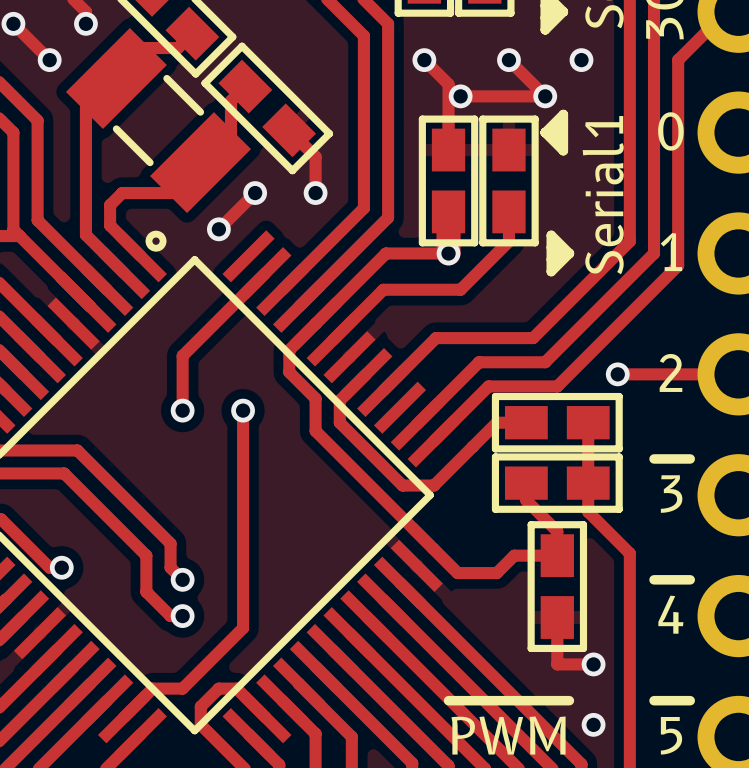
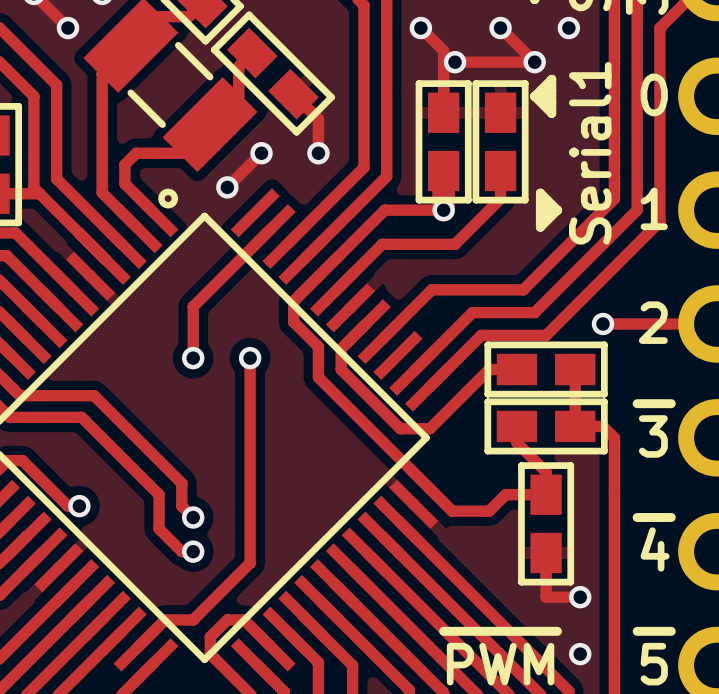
track: (588, 483) (588, 511) (629, 553) -> (575, 426) (603, 426) (614, 437) (614, 492)

